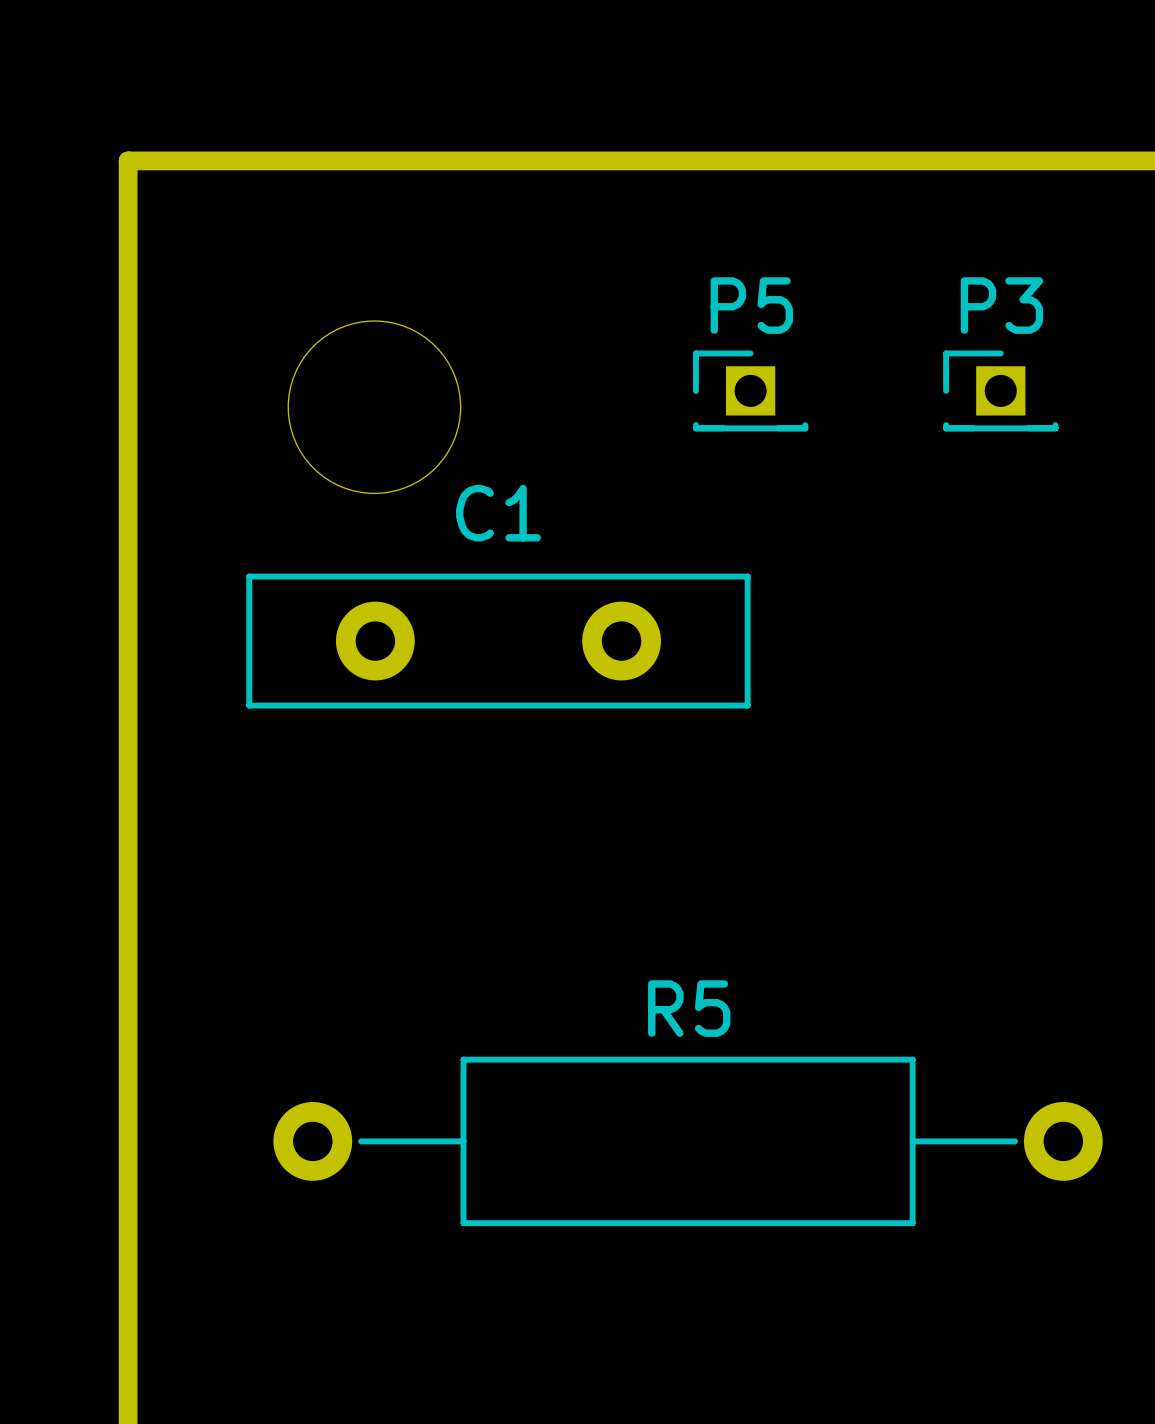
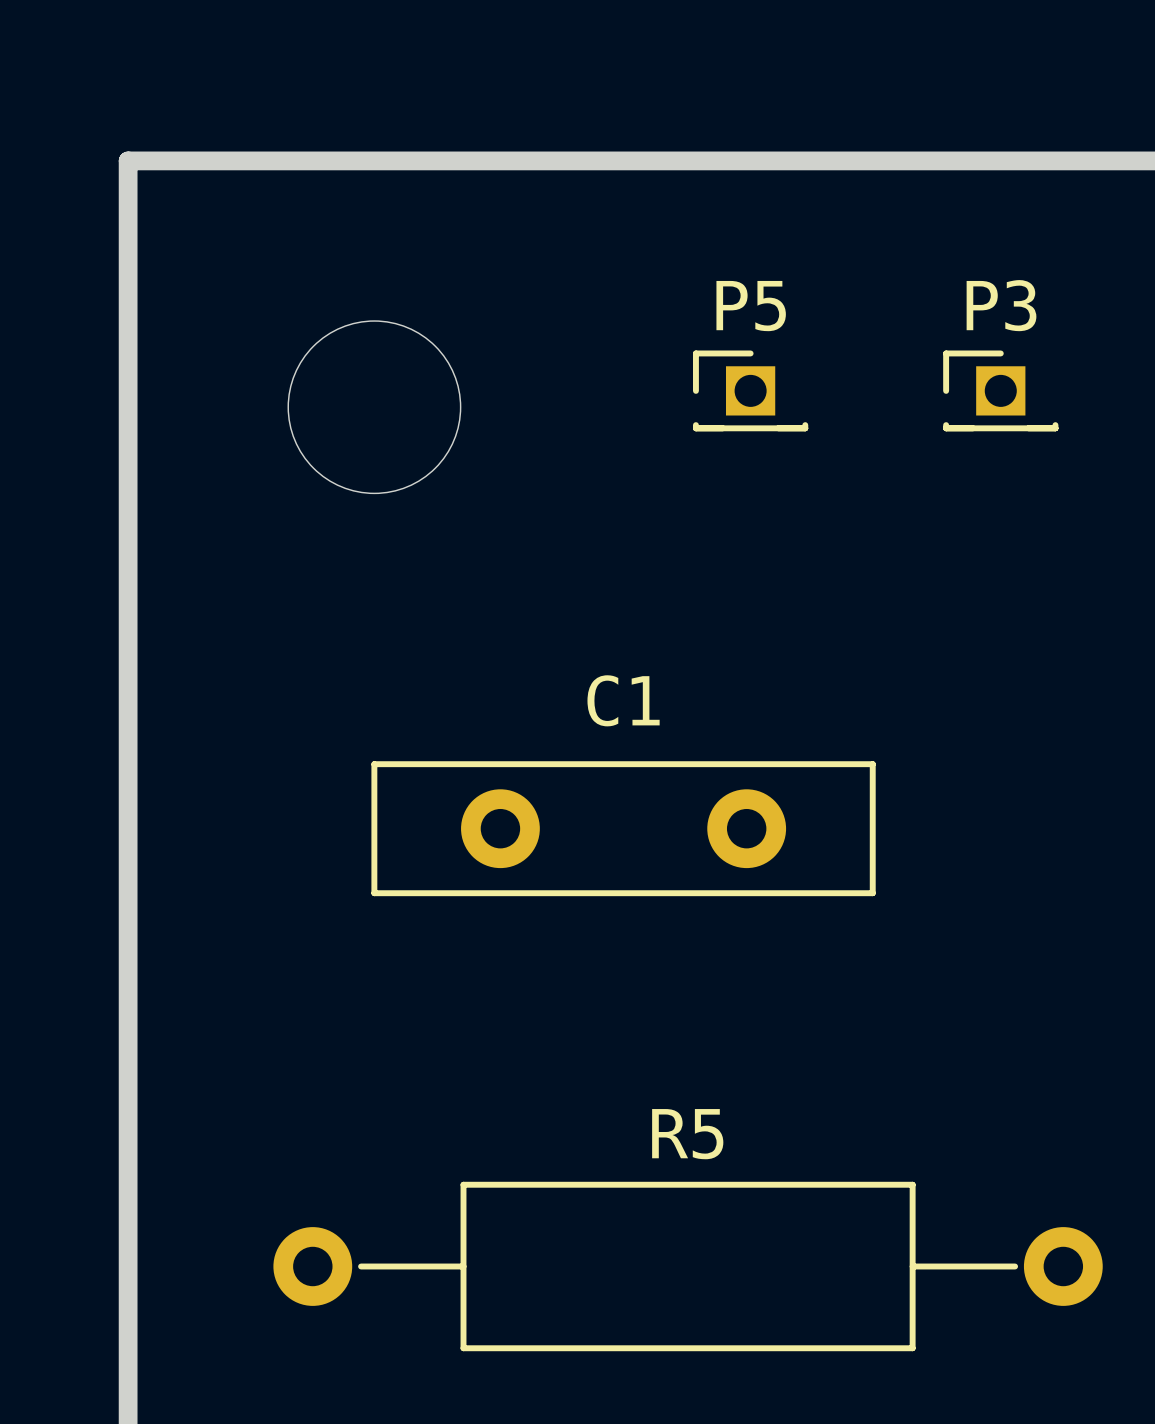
C1 position: (498, 641) -> (623, 828)
R5 position: (688, 1141) -> (688, 1266)

